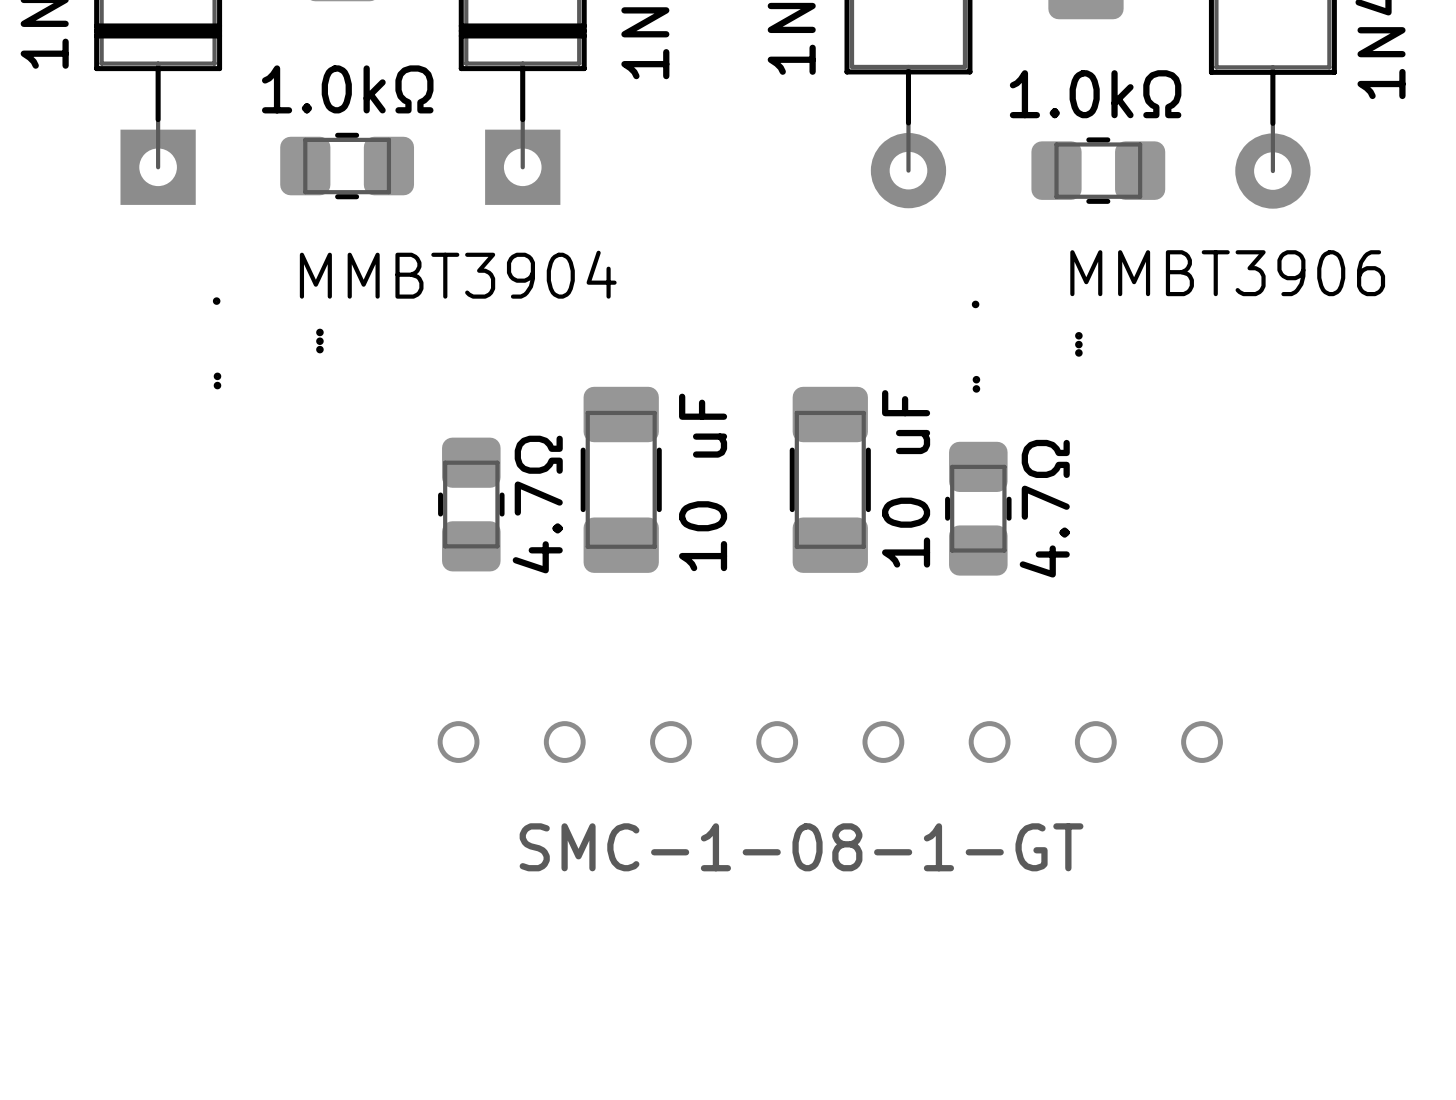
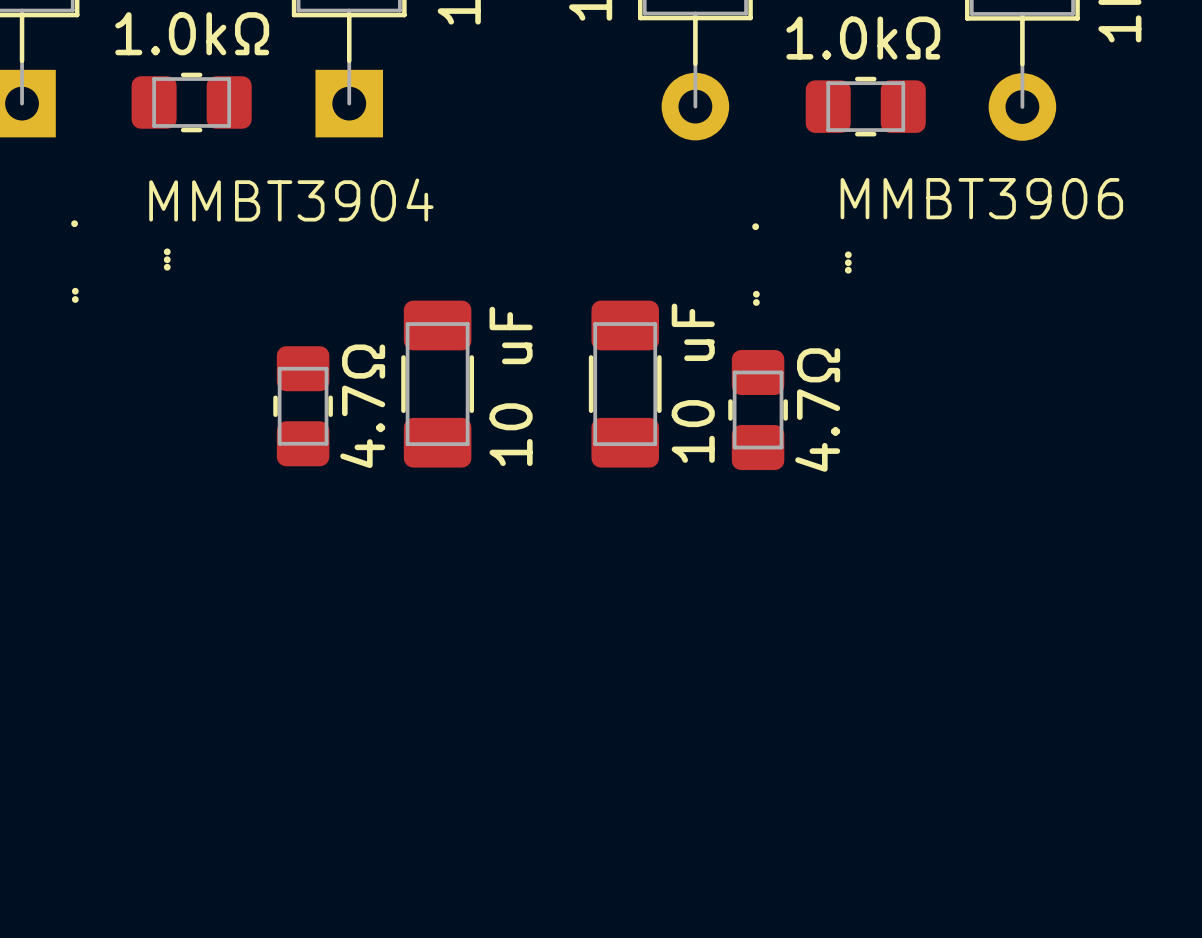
part: SMC-1-08-1-GT (830, 742) -> none

